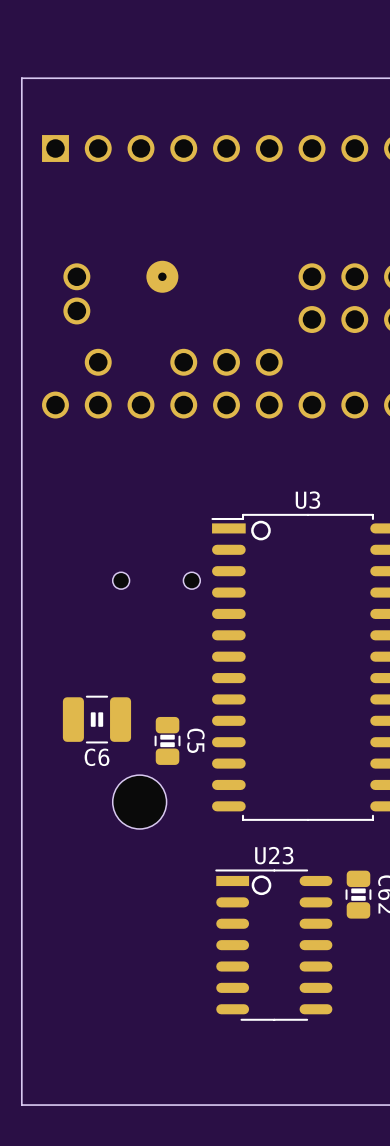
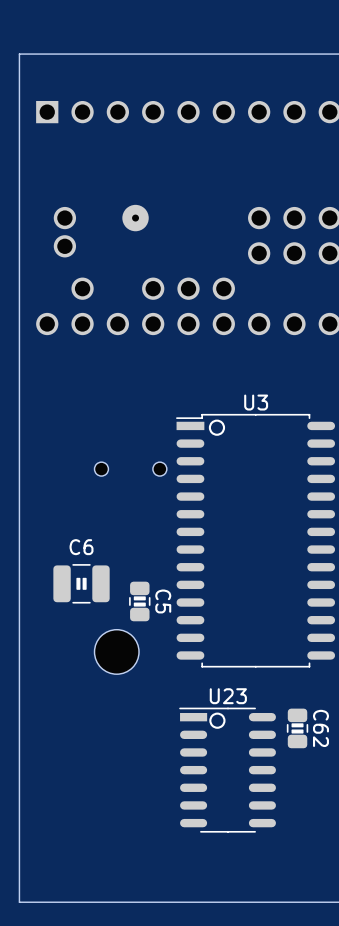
C6 name position: C6 (97, 757) -> C6 (81, 547)

